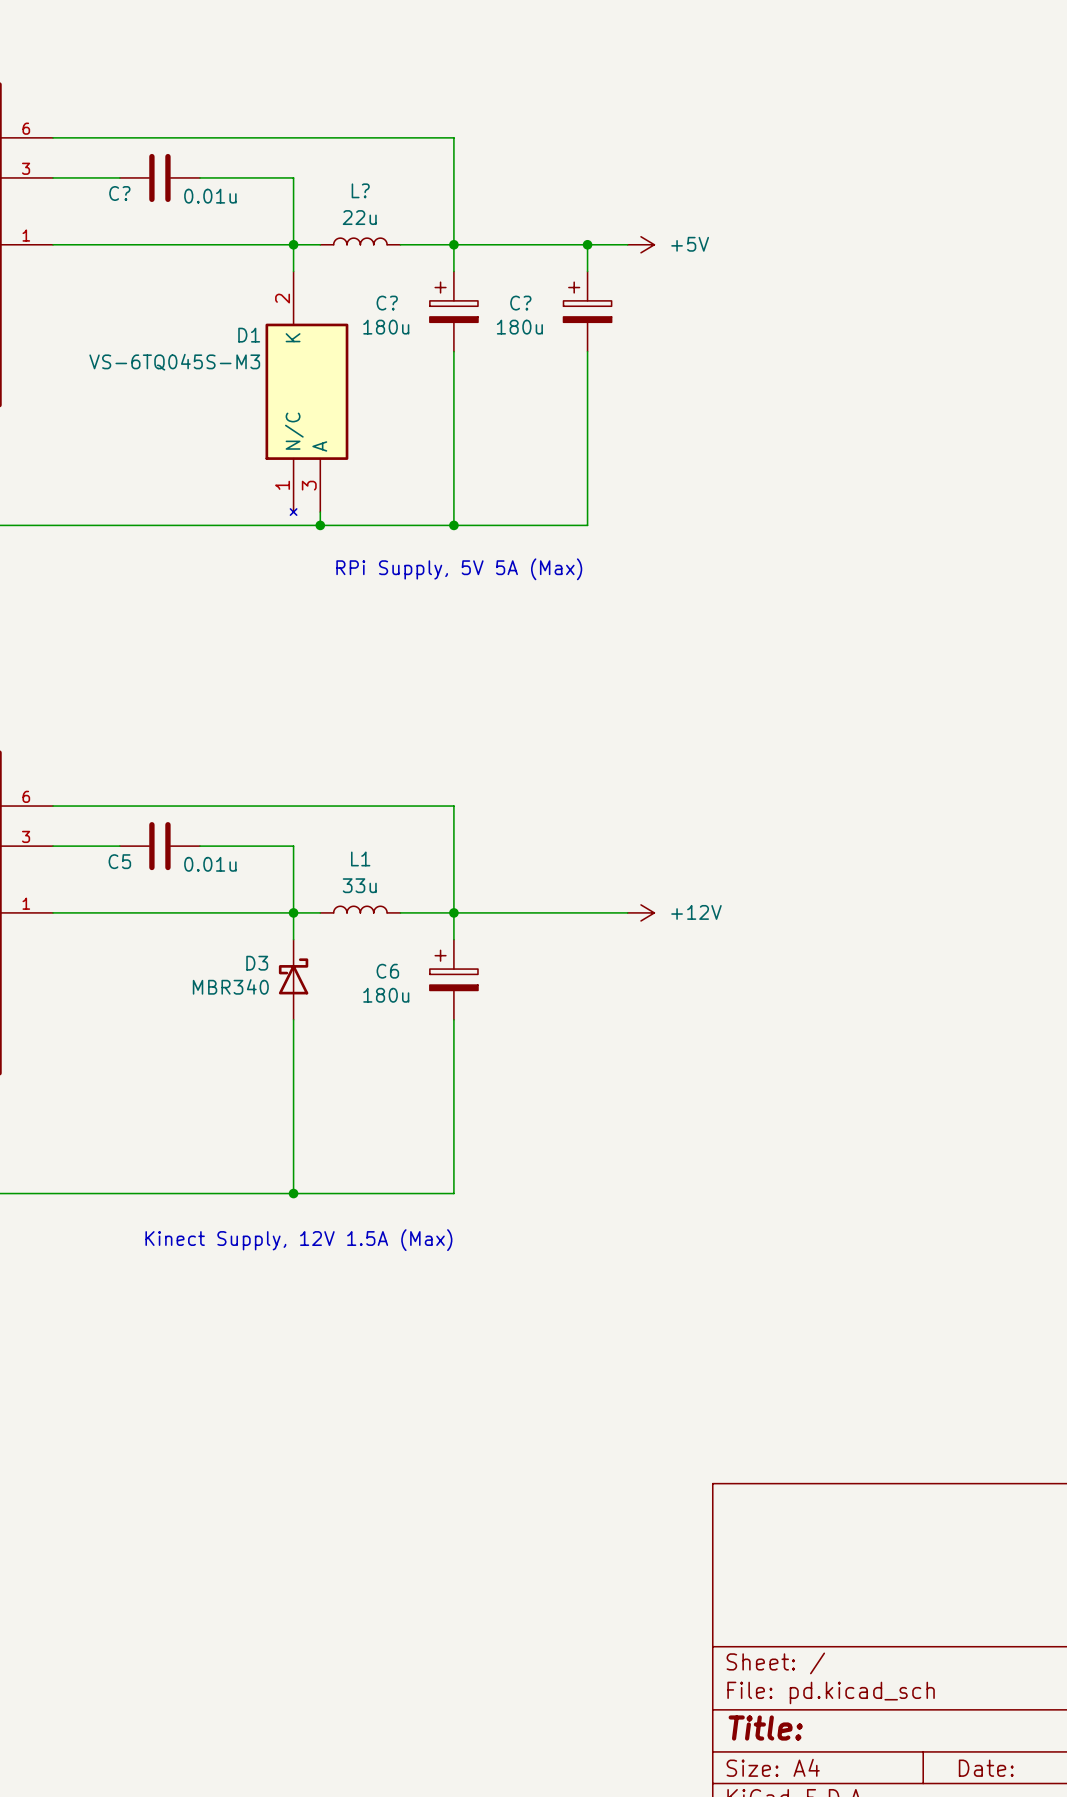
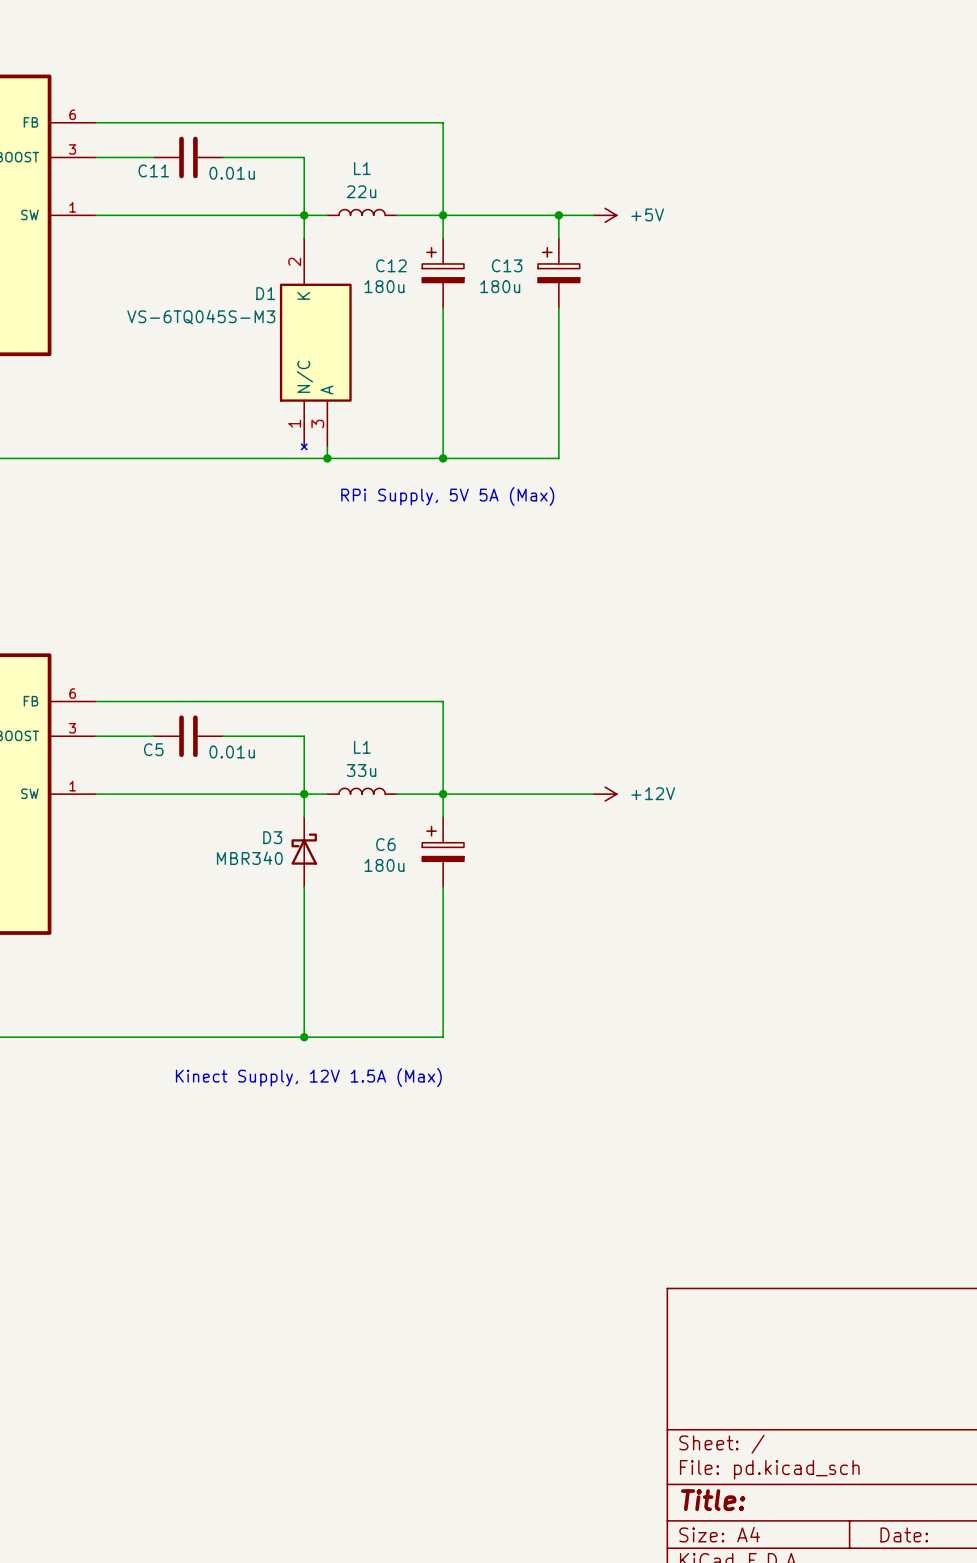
L? name: L? (360, 190) -> L1 (362, 168)
C? name: C? (119, 193) -> C11 (153, 170)
C? name: C? (387, 303) -> C12 (391, 265)
C? name: C? (520, 303) -> C13 (507, 265)

